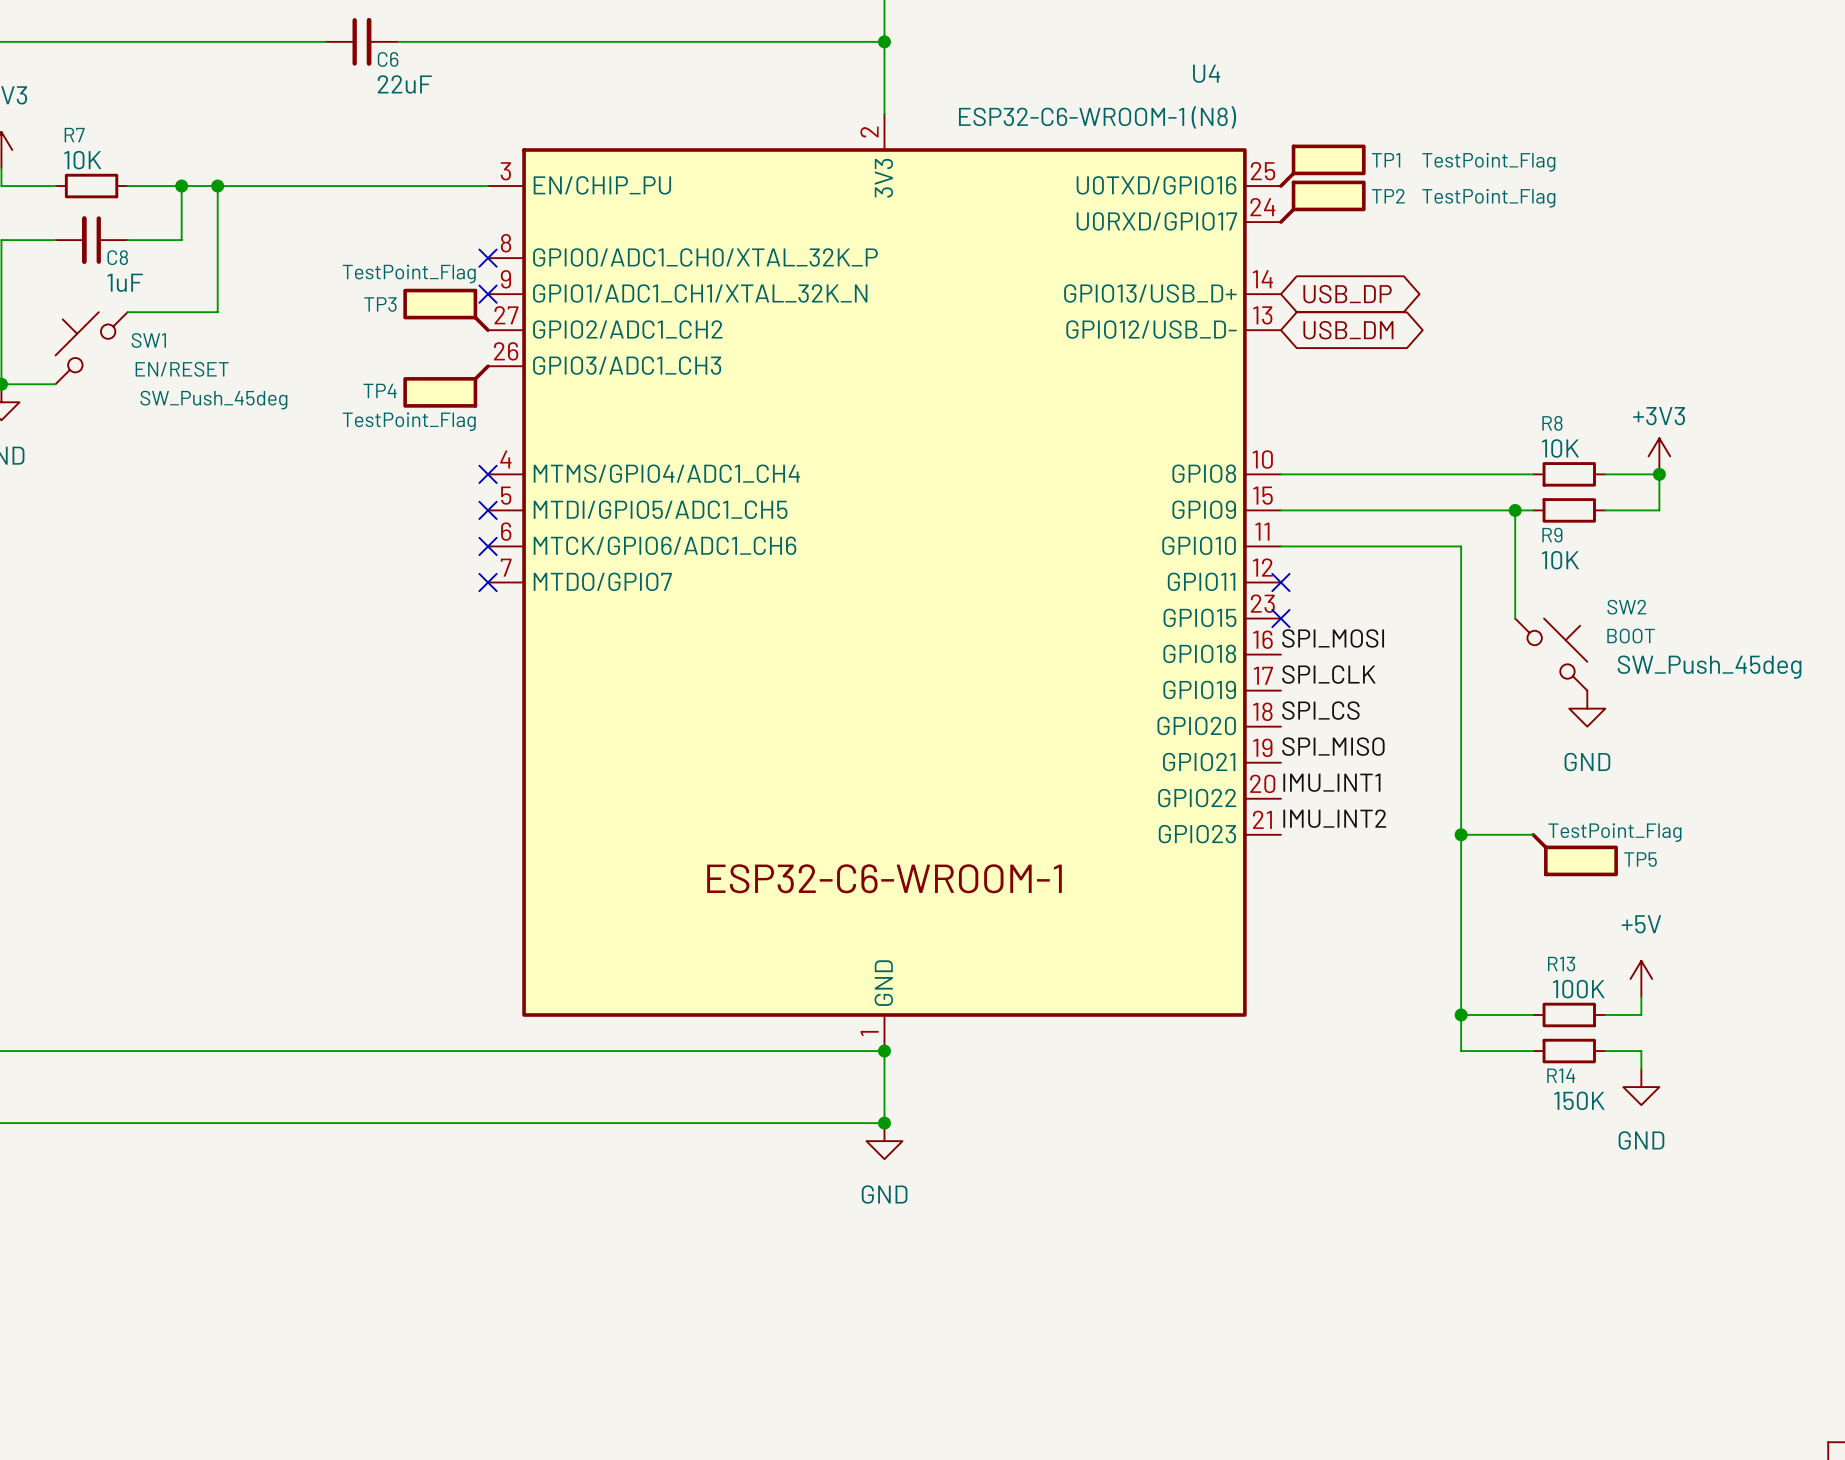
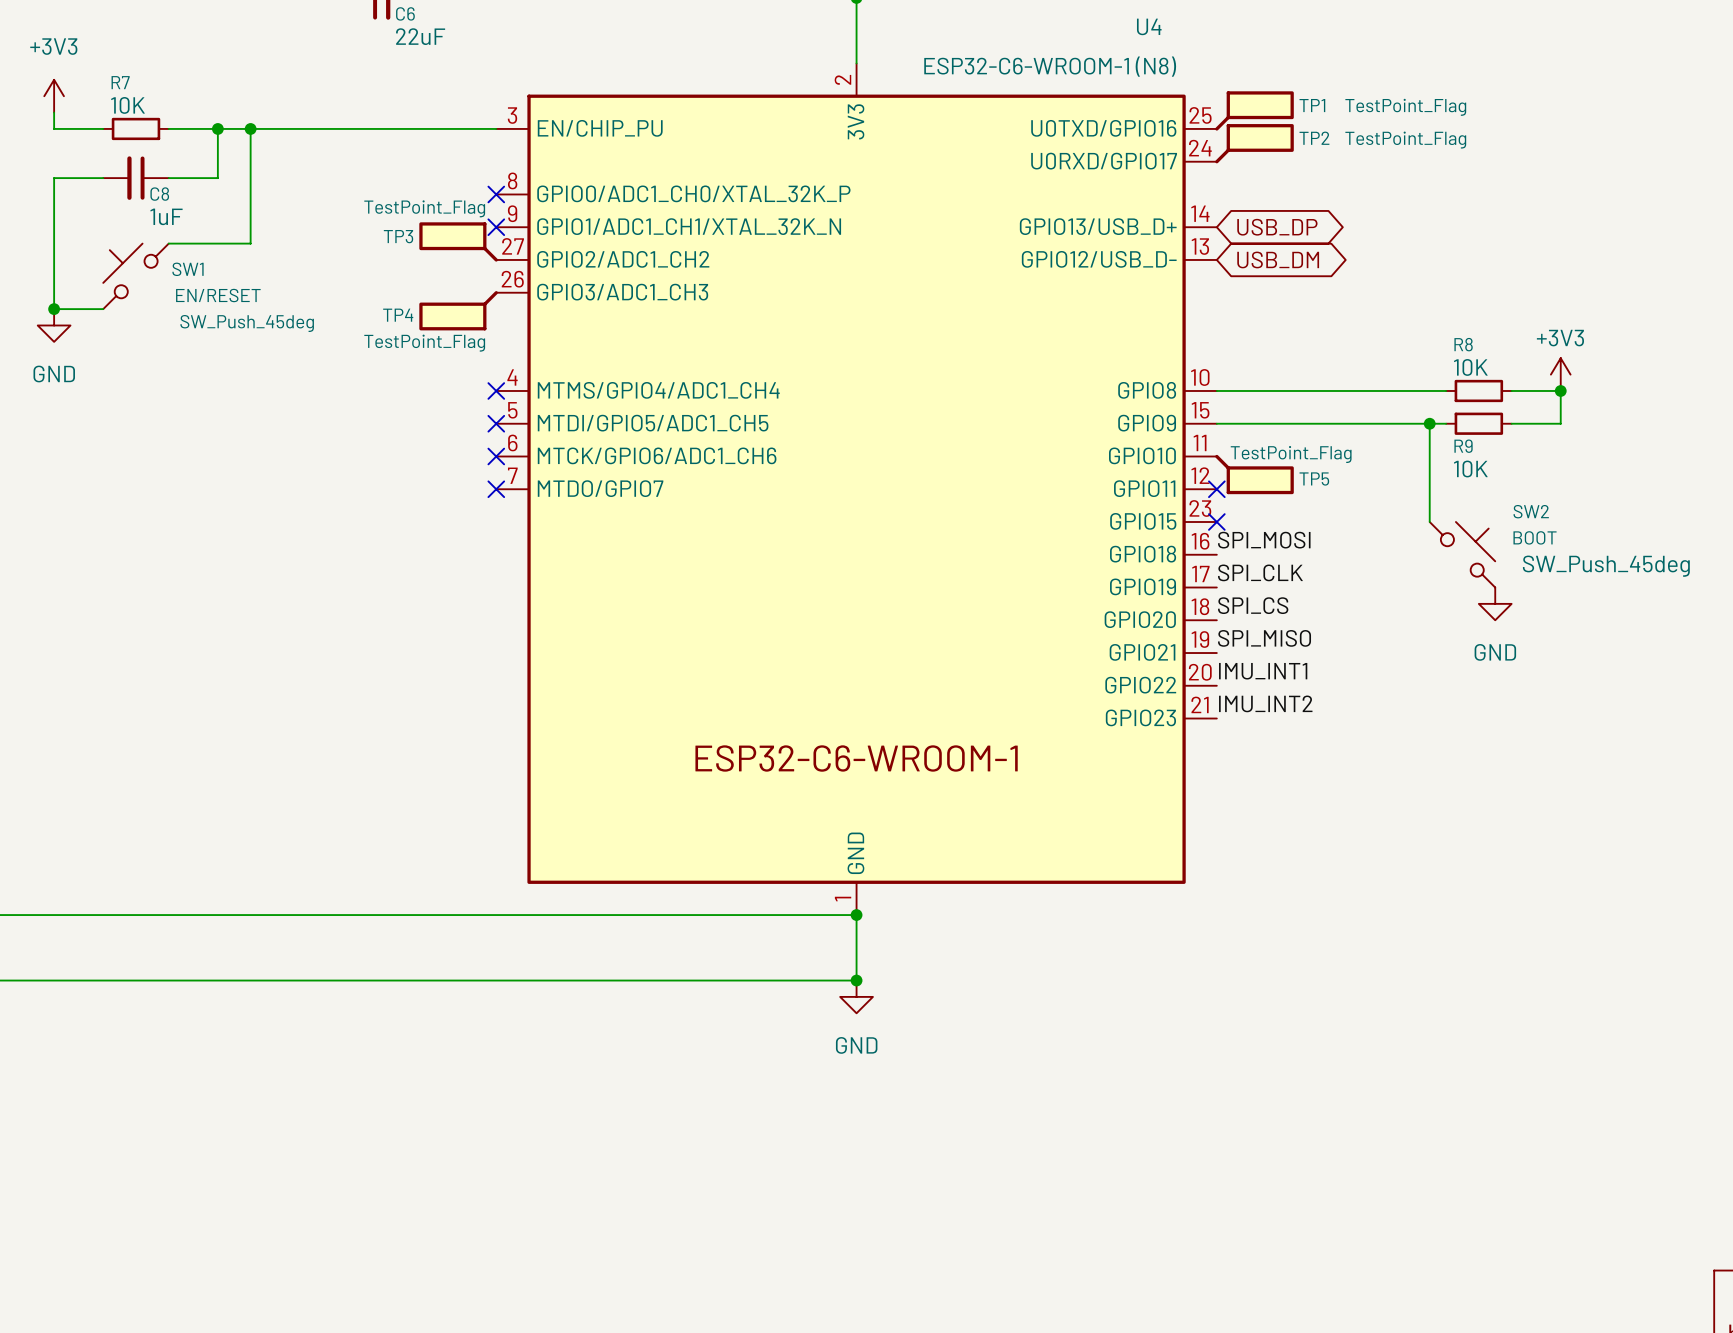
wire: (1280, 546) (1461, 546) (1461, 1051) (1533, 1051) -> none
wire: (1461, 834) (1533, 834) -> none
junction: (1461, 834) -> none
TP5 position: (1574, 854) -> (1254, 474)
power symbol: +5V (1641, 978) -> none
wire: (1641, 996) (1641, 1014) (1605, 1014) -> none
wire: (1461, 1014) (1533, 1014) -> none
junction: (1461, 1014) -> none
R13: 100K (1569, 1014) -> none
R14: 150K (1569, 1051) -> none
wire: (1605, 1051) (1641, 1051) (1641, 1069) -> none
power symbol: GND (1641, 1087) -> none

